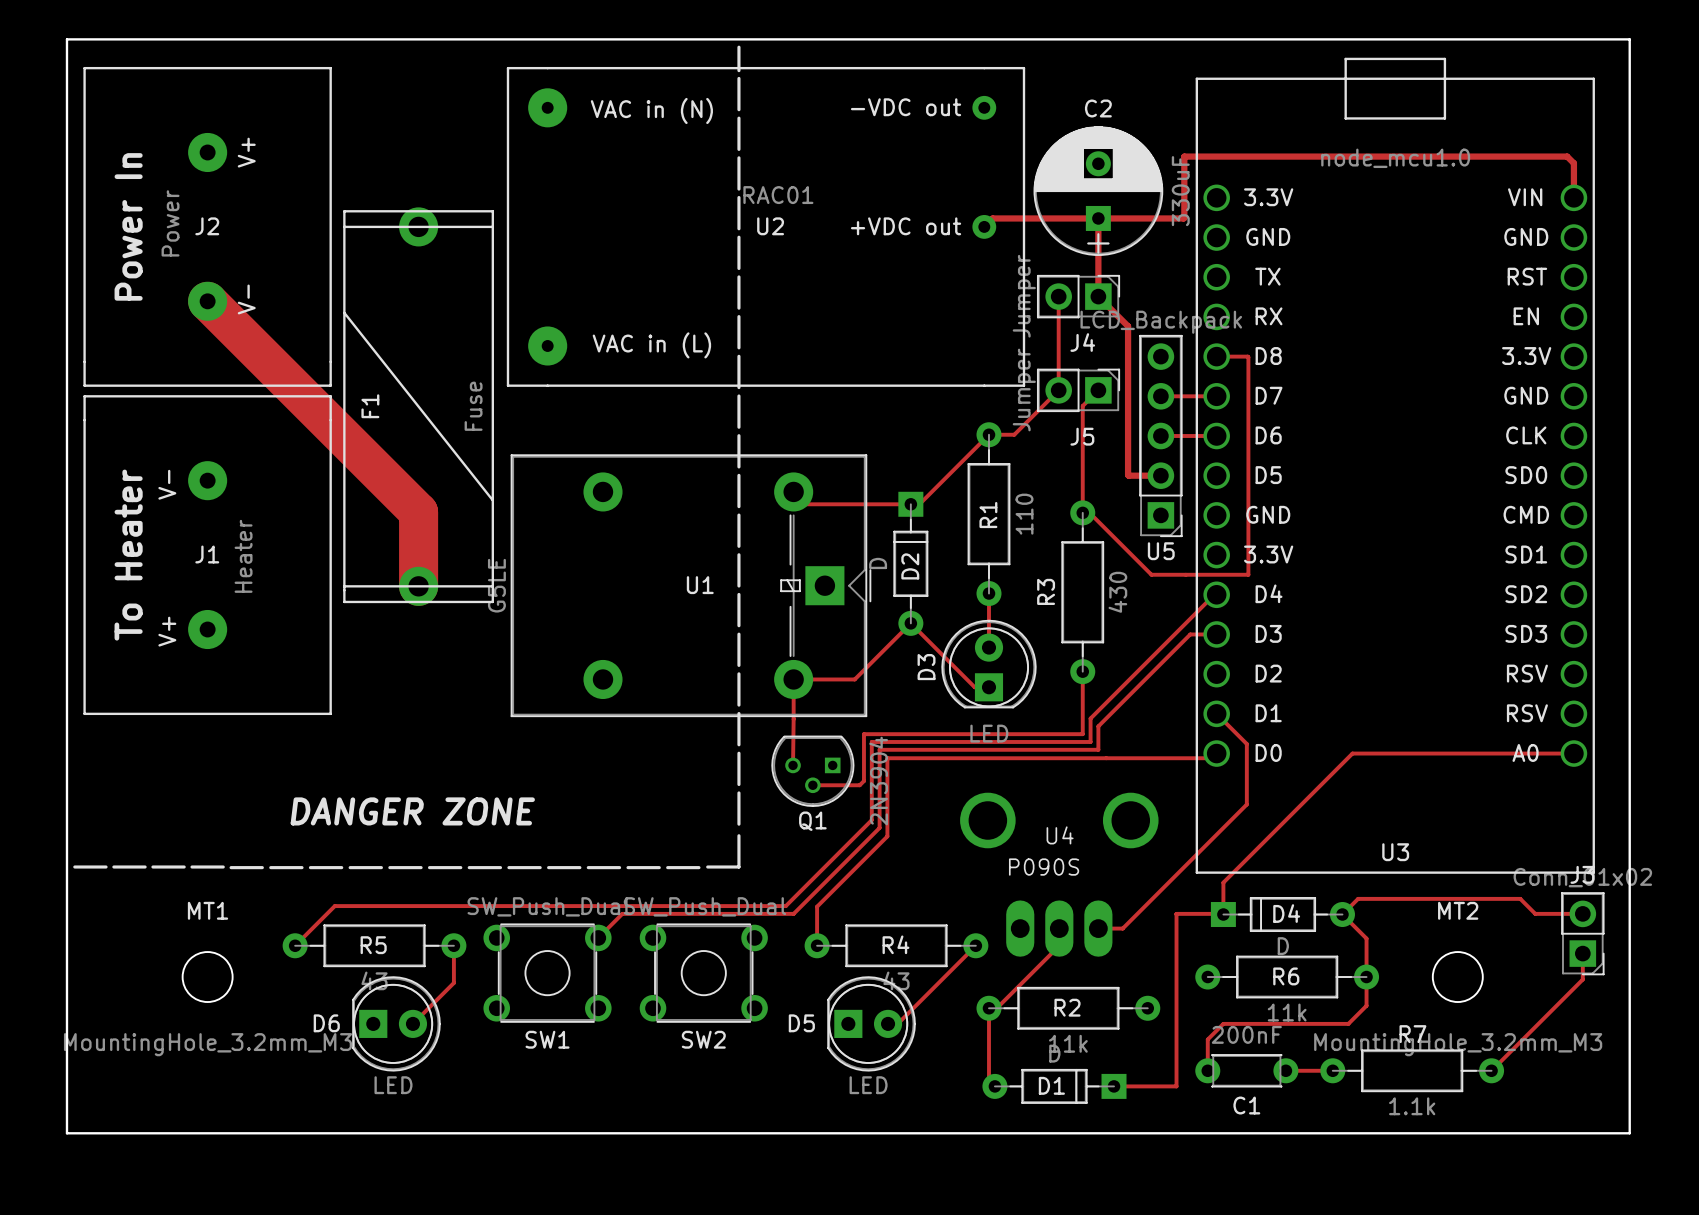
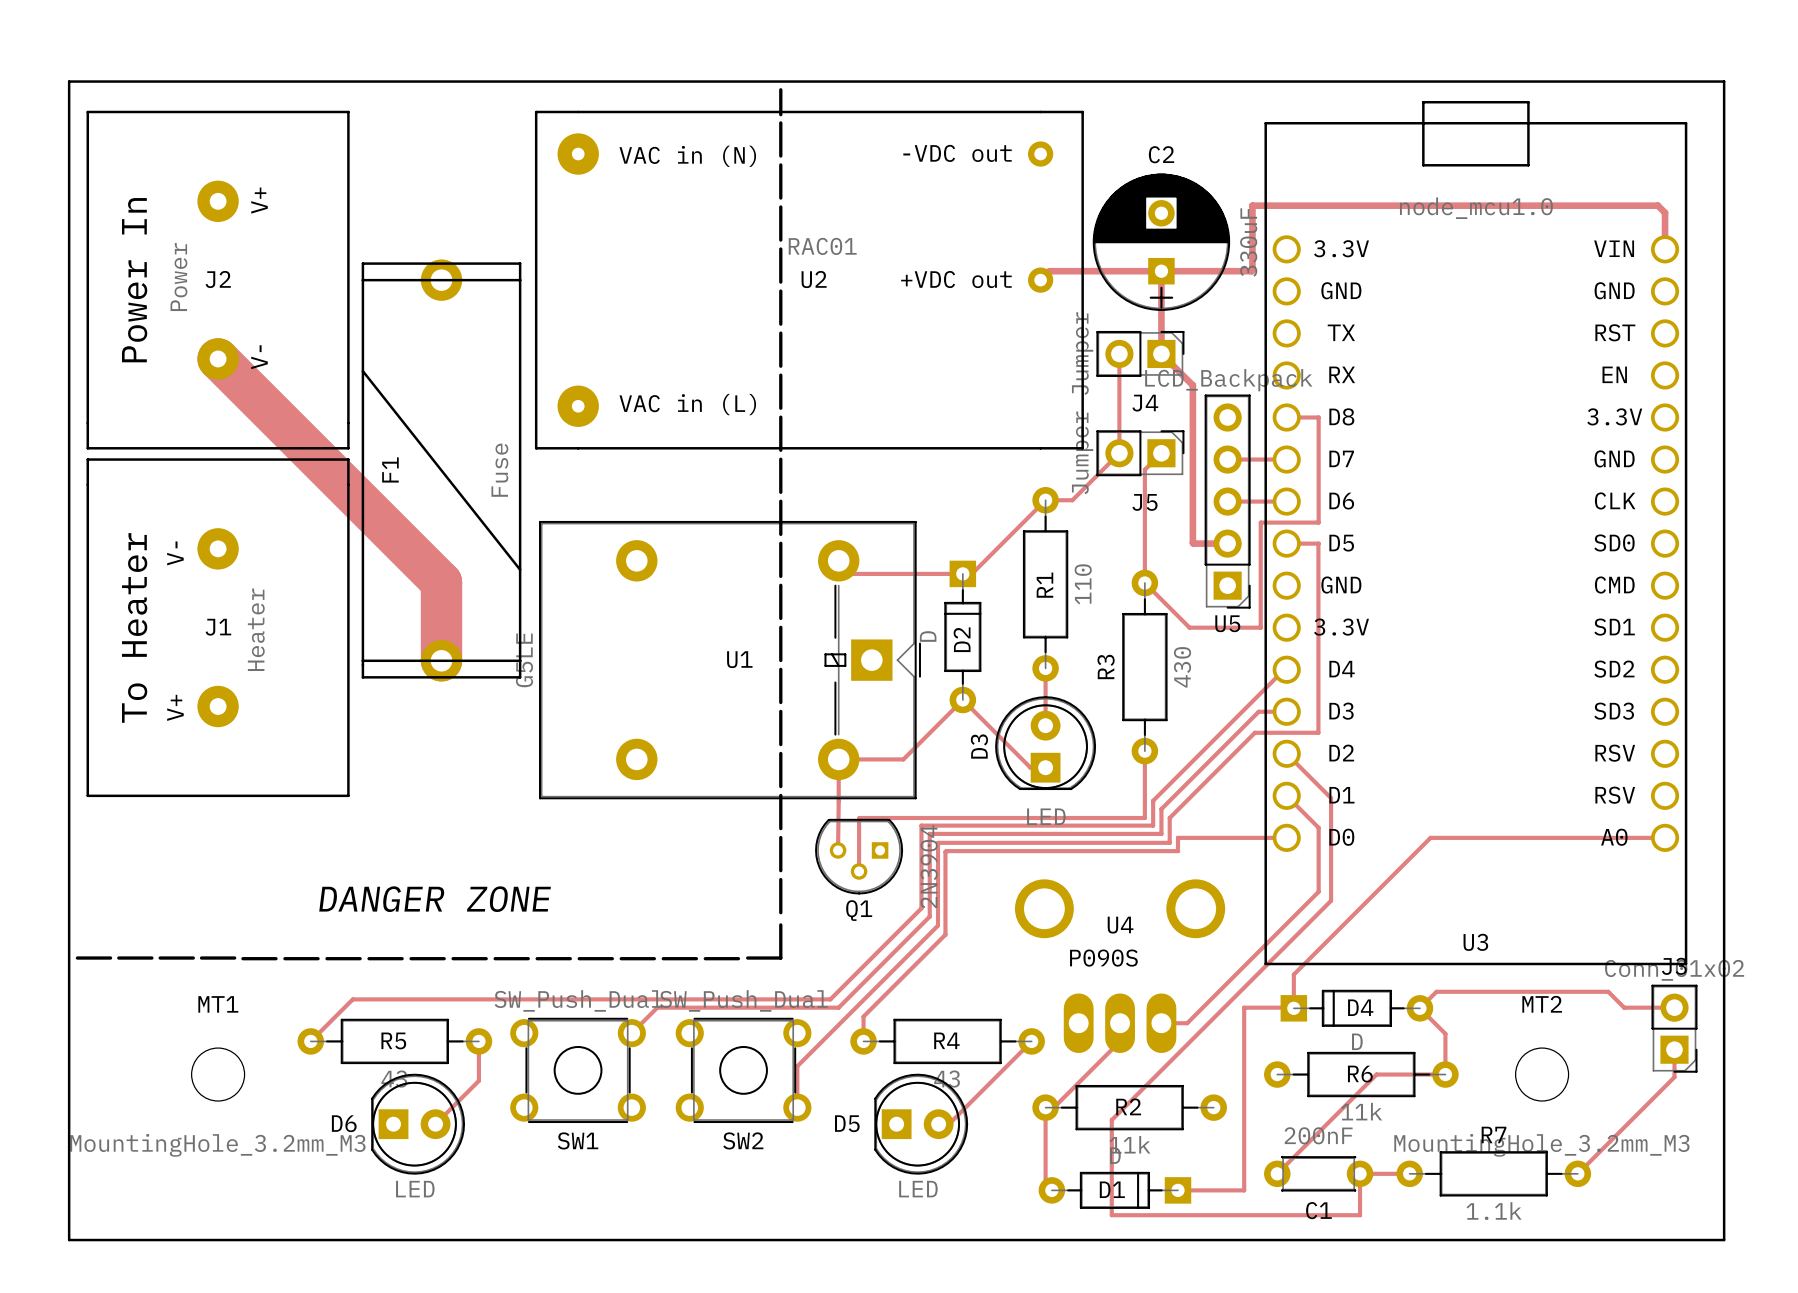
track: (1246, 356) (1248, 357) (1248, 574) (1151, 574) (1089, 512) (1082, 512) -> (1318, 417) (1318, 522) (1260, 522) (1260, 627) (1189, 627) (1144, 583)
track: none -> (1286, 753) (1331, 798) (1331, 900) (1111, 1120) (1111, 1215) (1360, 1215) (1360, 1173)
track: (1082, 734) (863, 734) (863, 781) (859, 785) (812, 785) -> (1144, 817) (859, 818) (859, 871)
track: (1216, 753) (1211, 758) (1106, 758) -> (1286, 543) (1318, 543) (1318, 732) (1254, 732) (1169, 818) (1169, 842)
track: none -> (1286, 837) (1177, 837) (1177, 851) (946, 851) (945, 934) (863, 1016)
track: (817, 906) (817, 922) -> (863, 1000) (797, 1066) (797, 1107)
track: (1366, 977) (1366, 1005) (1348, 1023) (1223, 1023) (1207, 1039) (1207, 1070) -> (1445, 1074) (1376, 1074) (1277, 1173)

